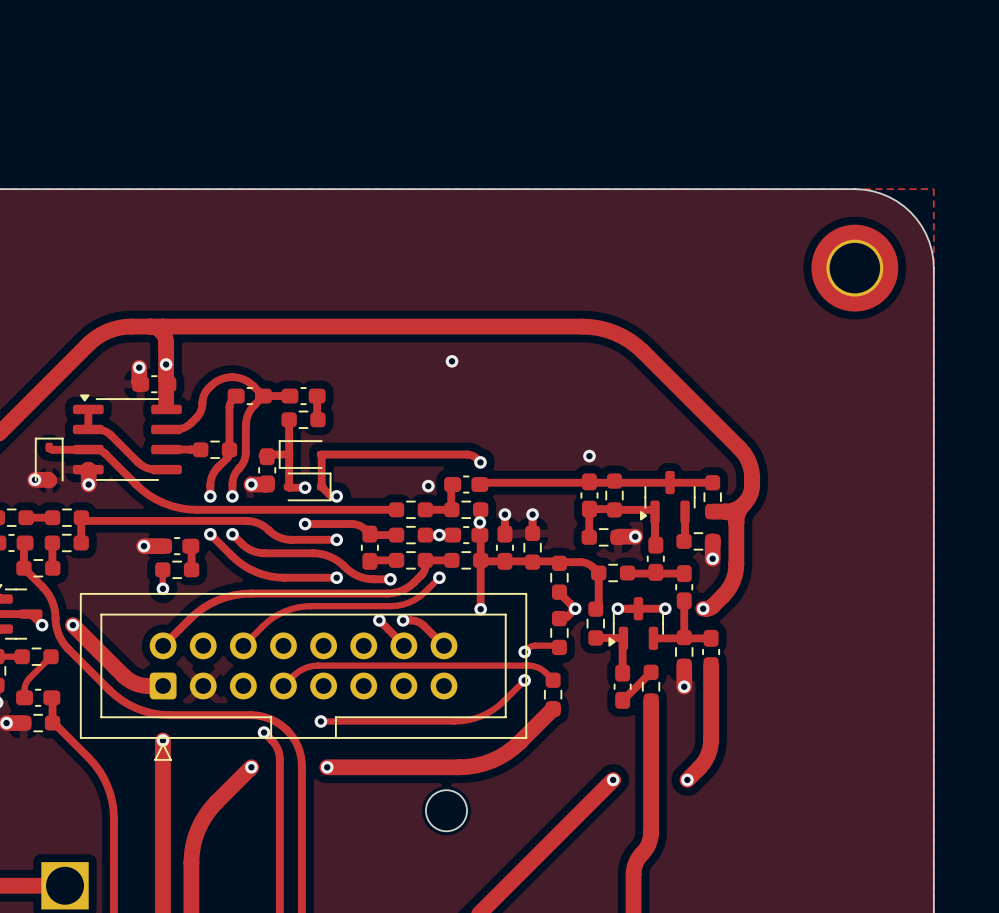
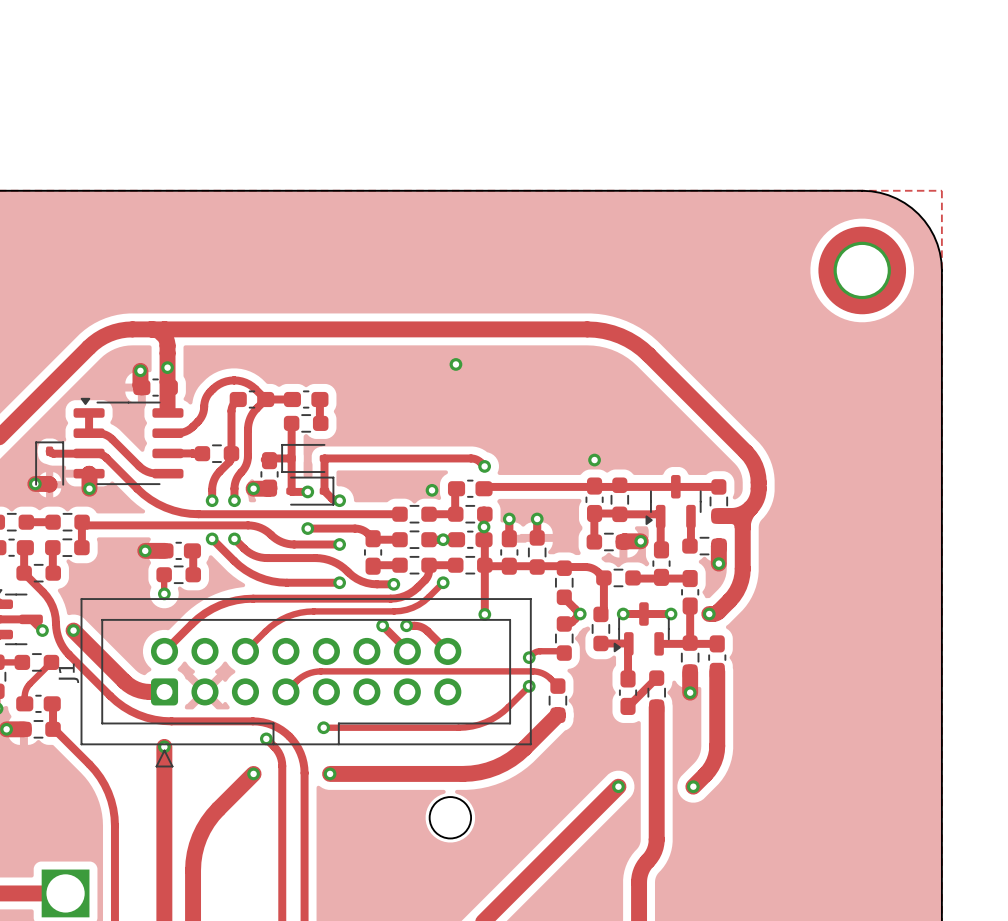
J1 name: none -> J1 (68, 673)

